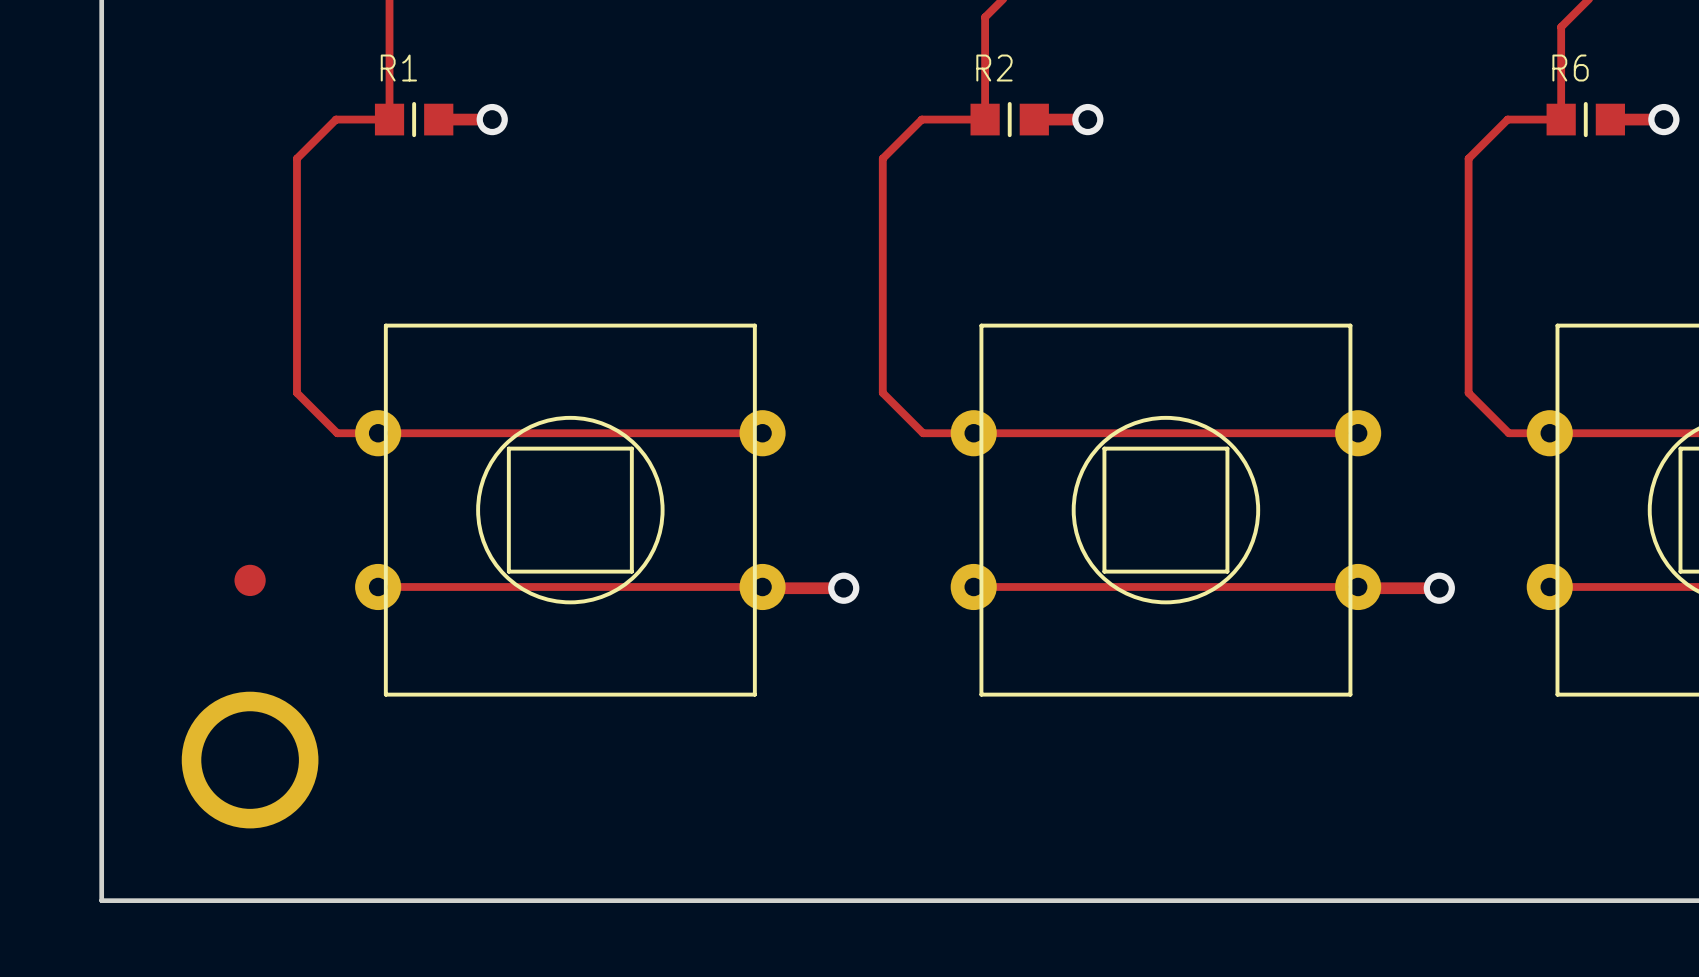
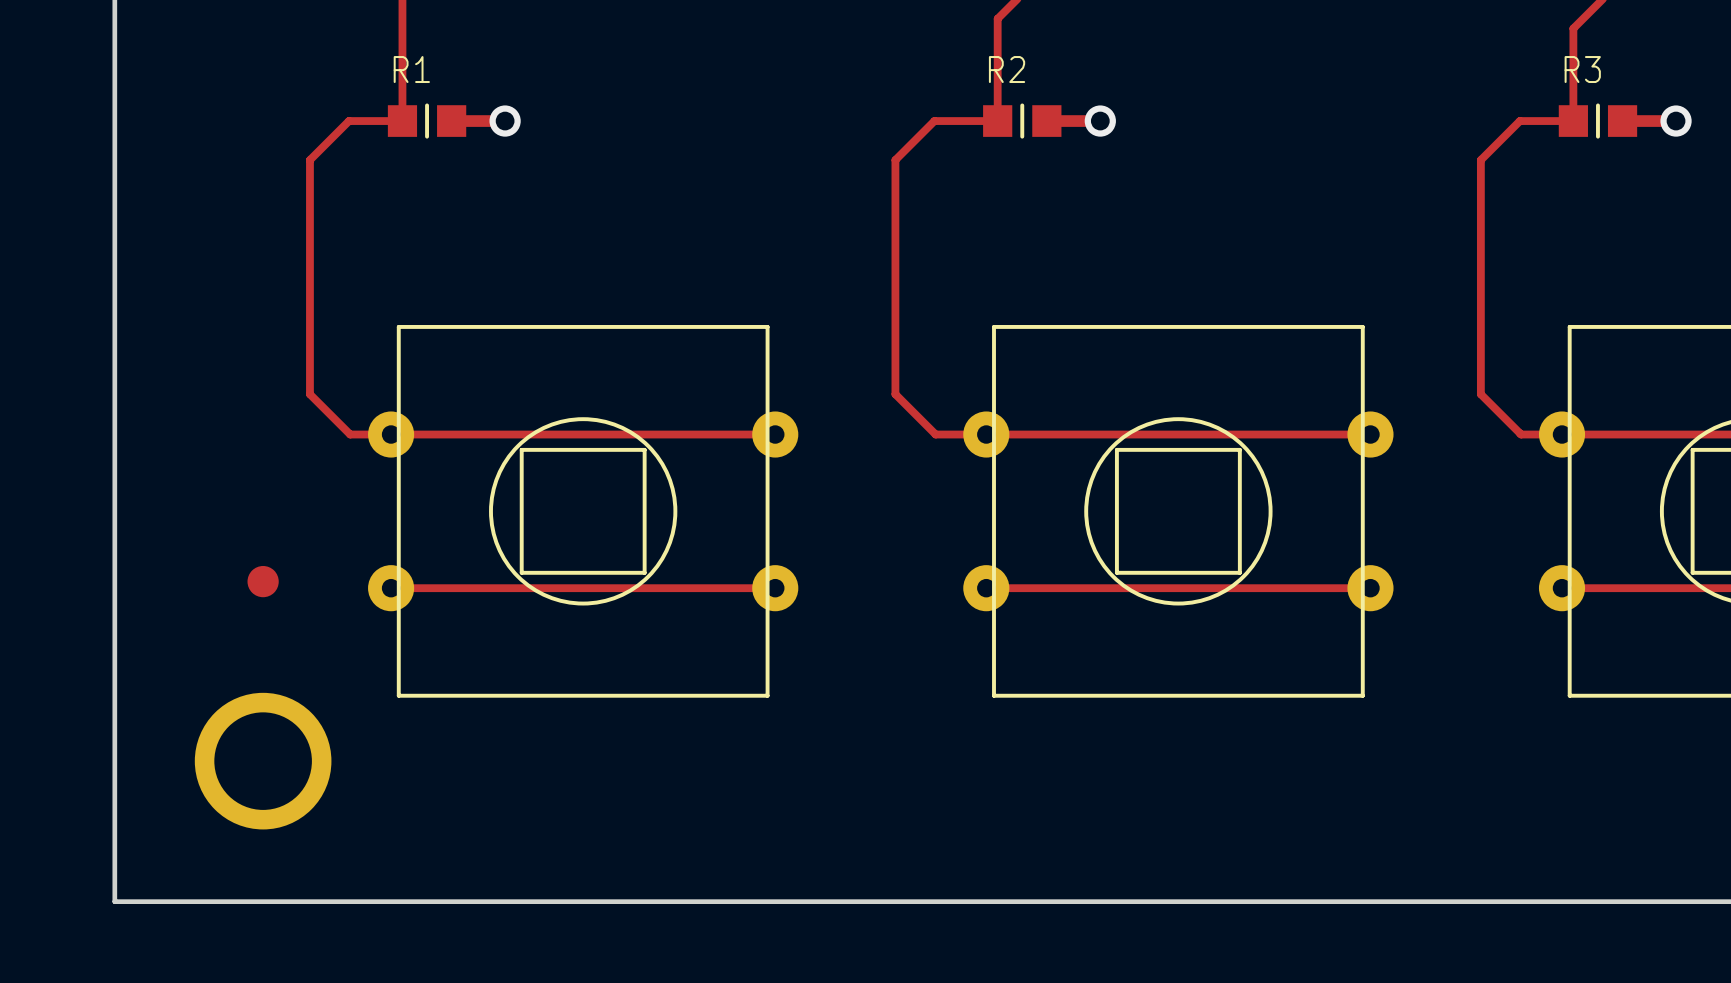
R6 name: R6 (1570, 68) -> R3 (1582, 69)
top track: (762, 586) (843, 588) -> none
top track: (1358, 586) (1439, 588) -> none
via: (843, 588) -> none
via: (1439, 588) -> none

